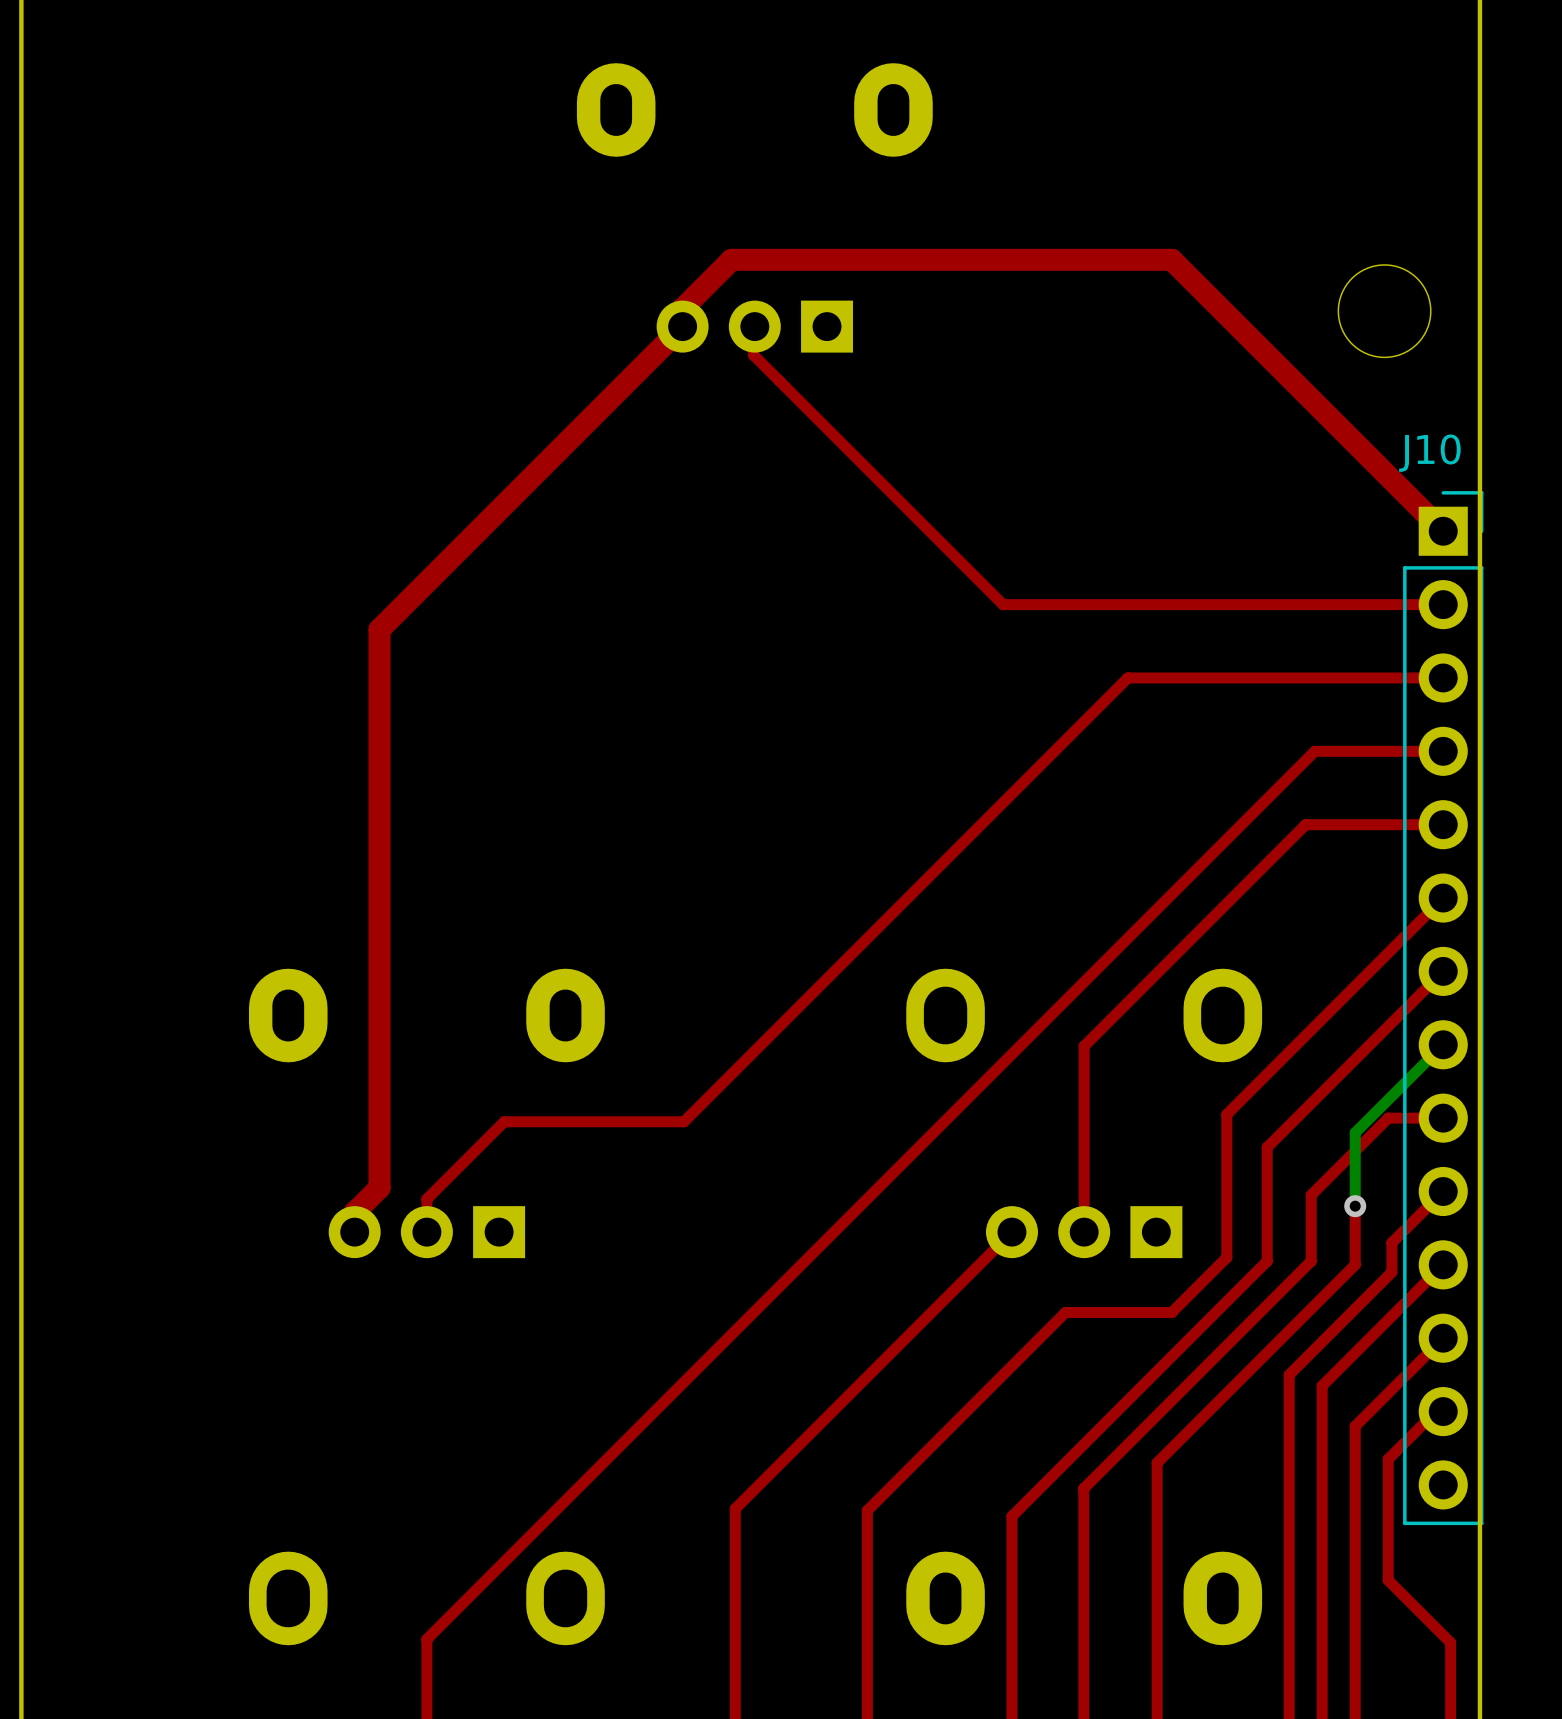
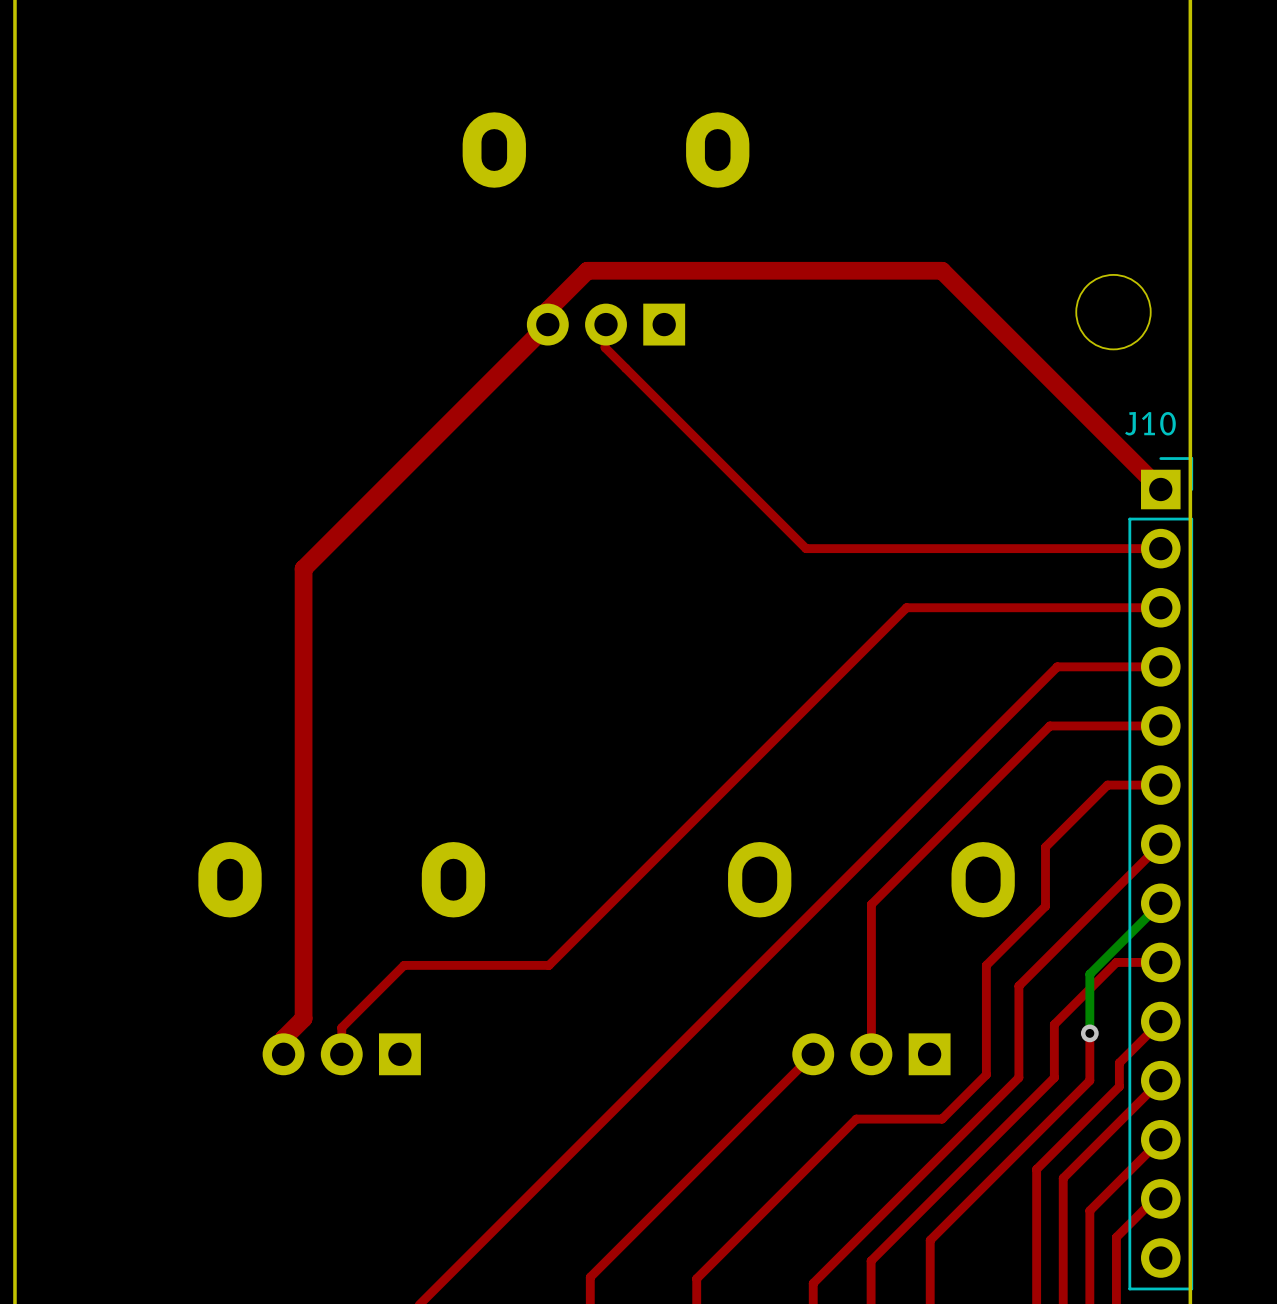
top track: (1443, 898) (1226, 1114) (1226, 1121) -> (1160, 785) (1107, 785) (1045, 847) (1045, 906) (986, 965)

